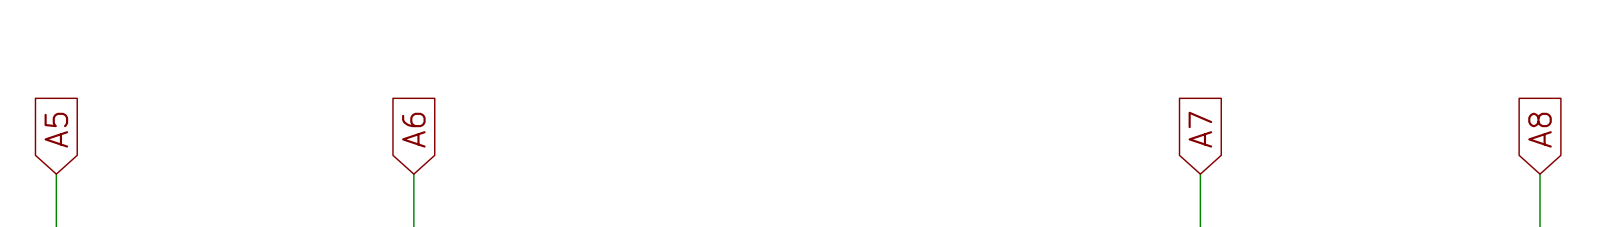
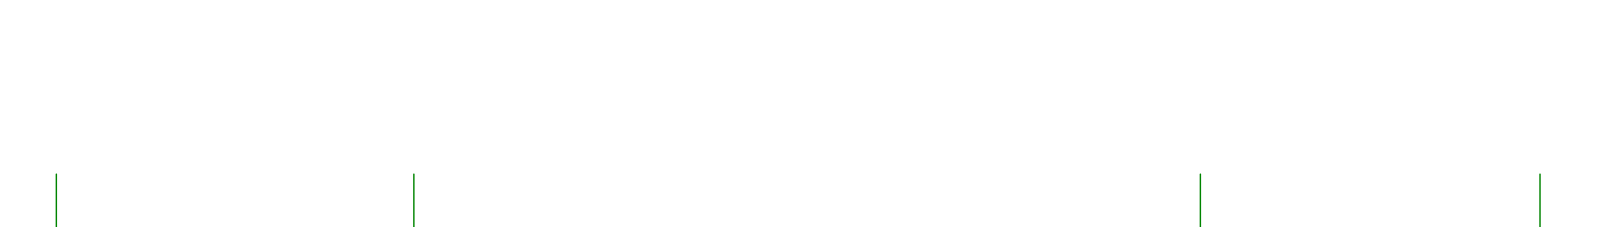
global label: A7 (1200, 129) -> none
global label: A5 (56, 130) -> none
global label: A6 (413, 130) -> none
global label: A8 (1540, 130) -> none

